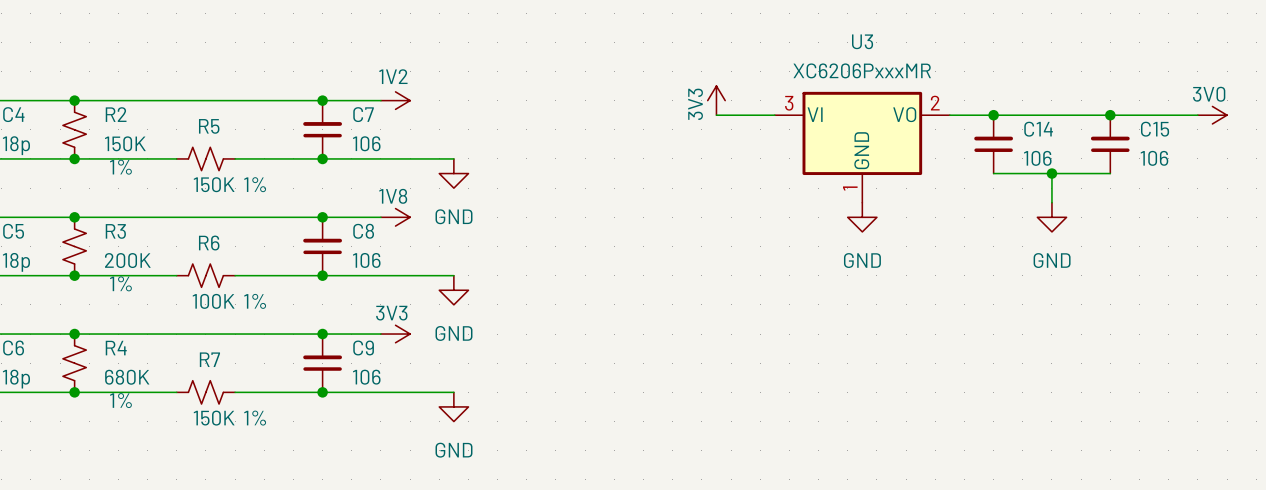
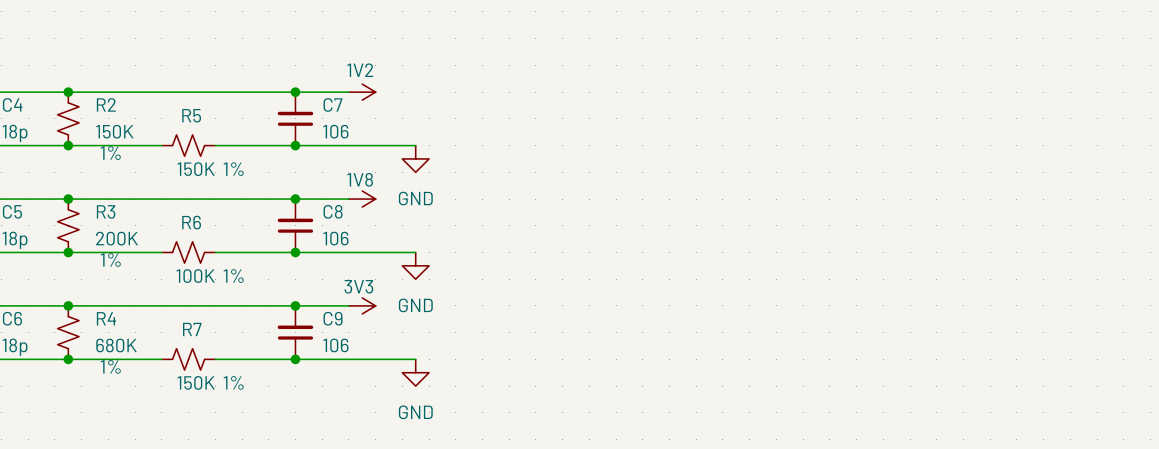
power symbol: 3V3 (716, 100) -> none
wire: (716, 115) (774, 115) -> none
wire: (949, 115) (1197, 115) -> none
junction: (993, 115) -> none
junction: (1110, 115) -> none
power symbol: 3V0 (1212, 115) -> none
C14: 106 (993, 144) -> none
C15: 106 (1110, 144) -> none
U3: XC6206PxxxMR (862, 147) -> none
wire: (993, 173) (1110, 173) -> none
wire: (1051, 173) (1051, 202) -> none
junction: (1051, 173) -> none
power symbol: GND (862, 217) -> none
power symbol: GND (1051, 217) -> none

